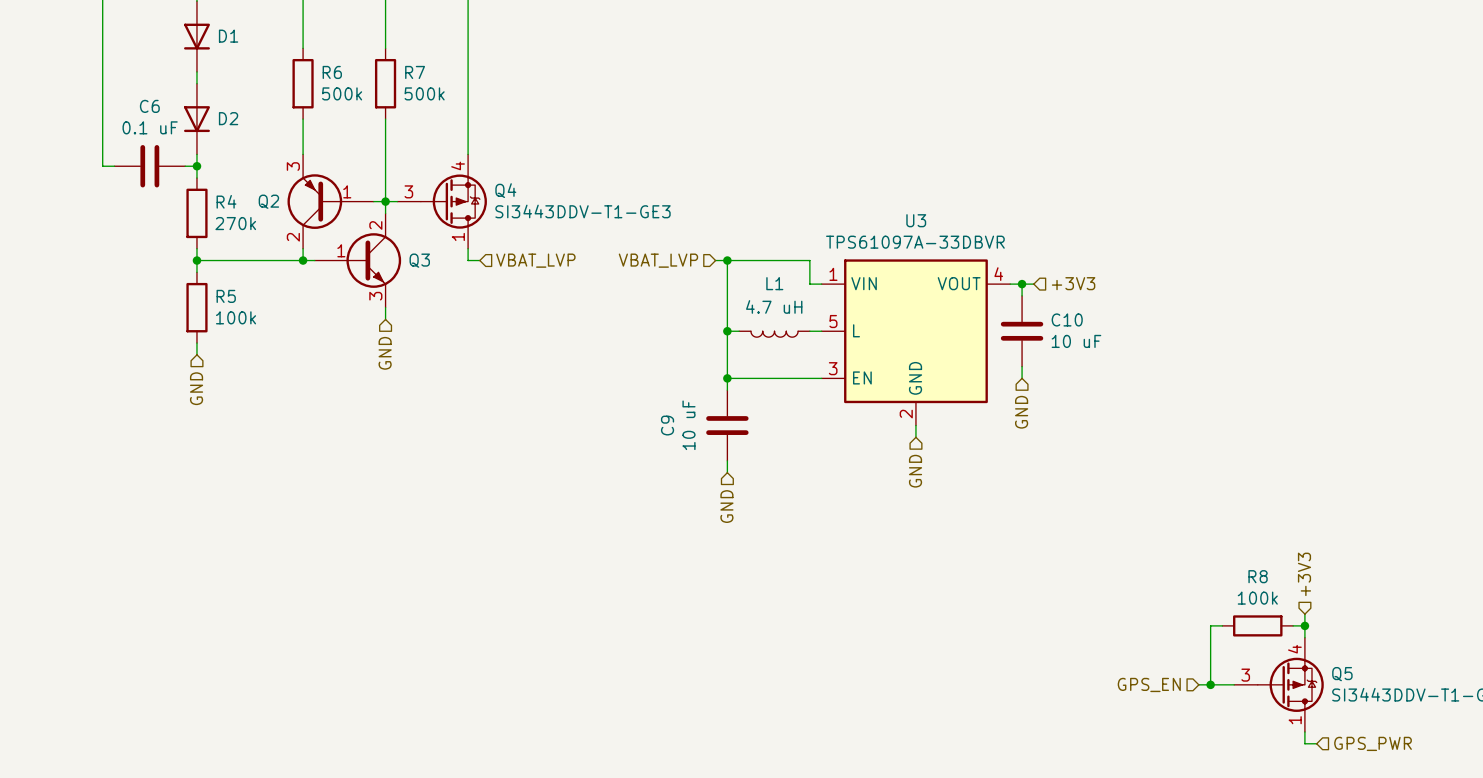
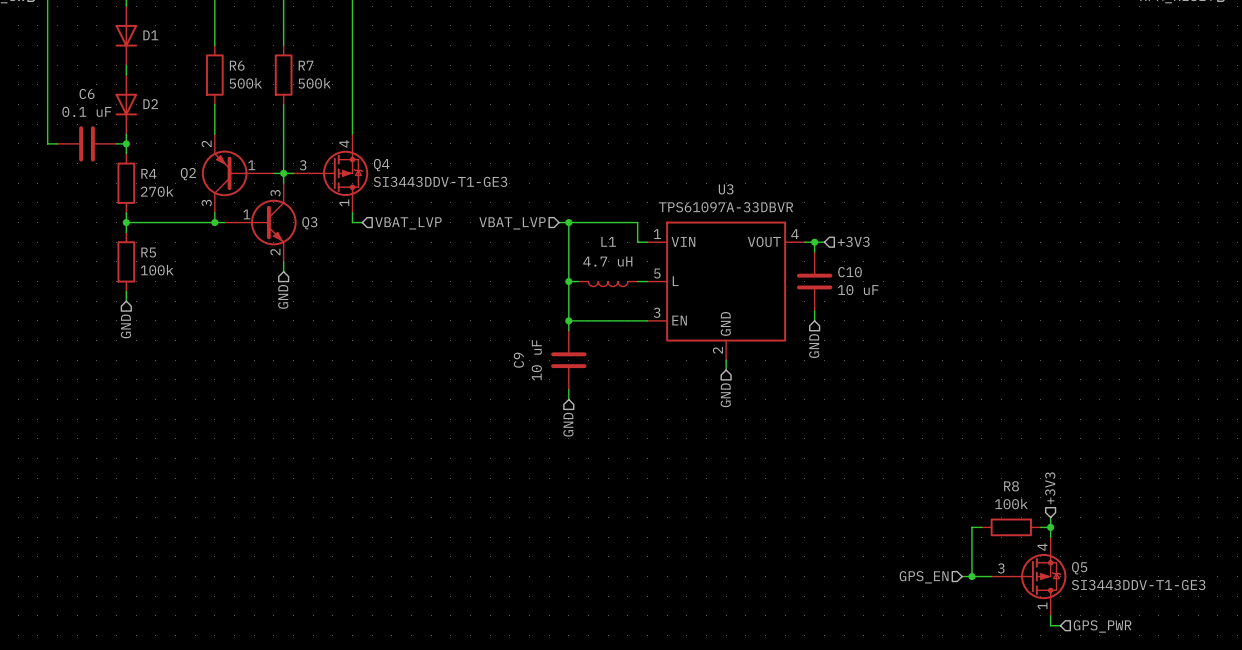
Q2 pin number: 3 (293, 166) -> 2 (206, 143)
Q3 pin number: 2 (375, 225) -> 3 (275, 193)
Q2 pin number: 2 (293, 237) -> 3 (206, 203)
Q3 pin number: 3 (375, 296) -> 2 (275, 252)

